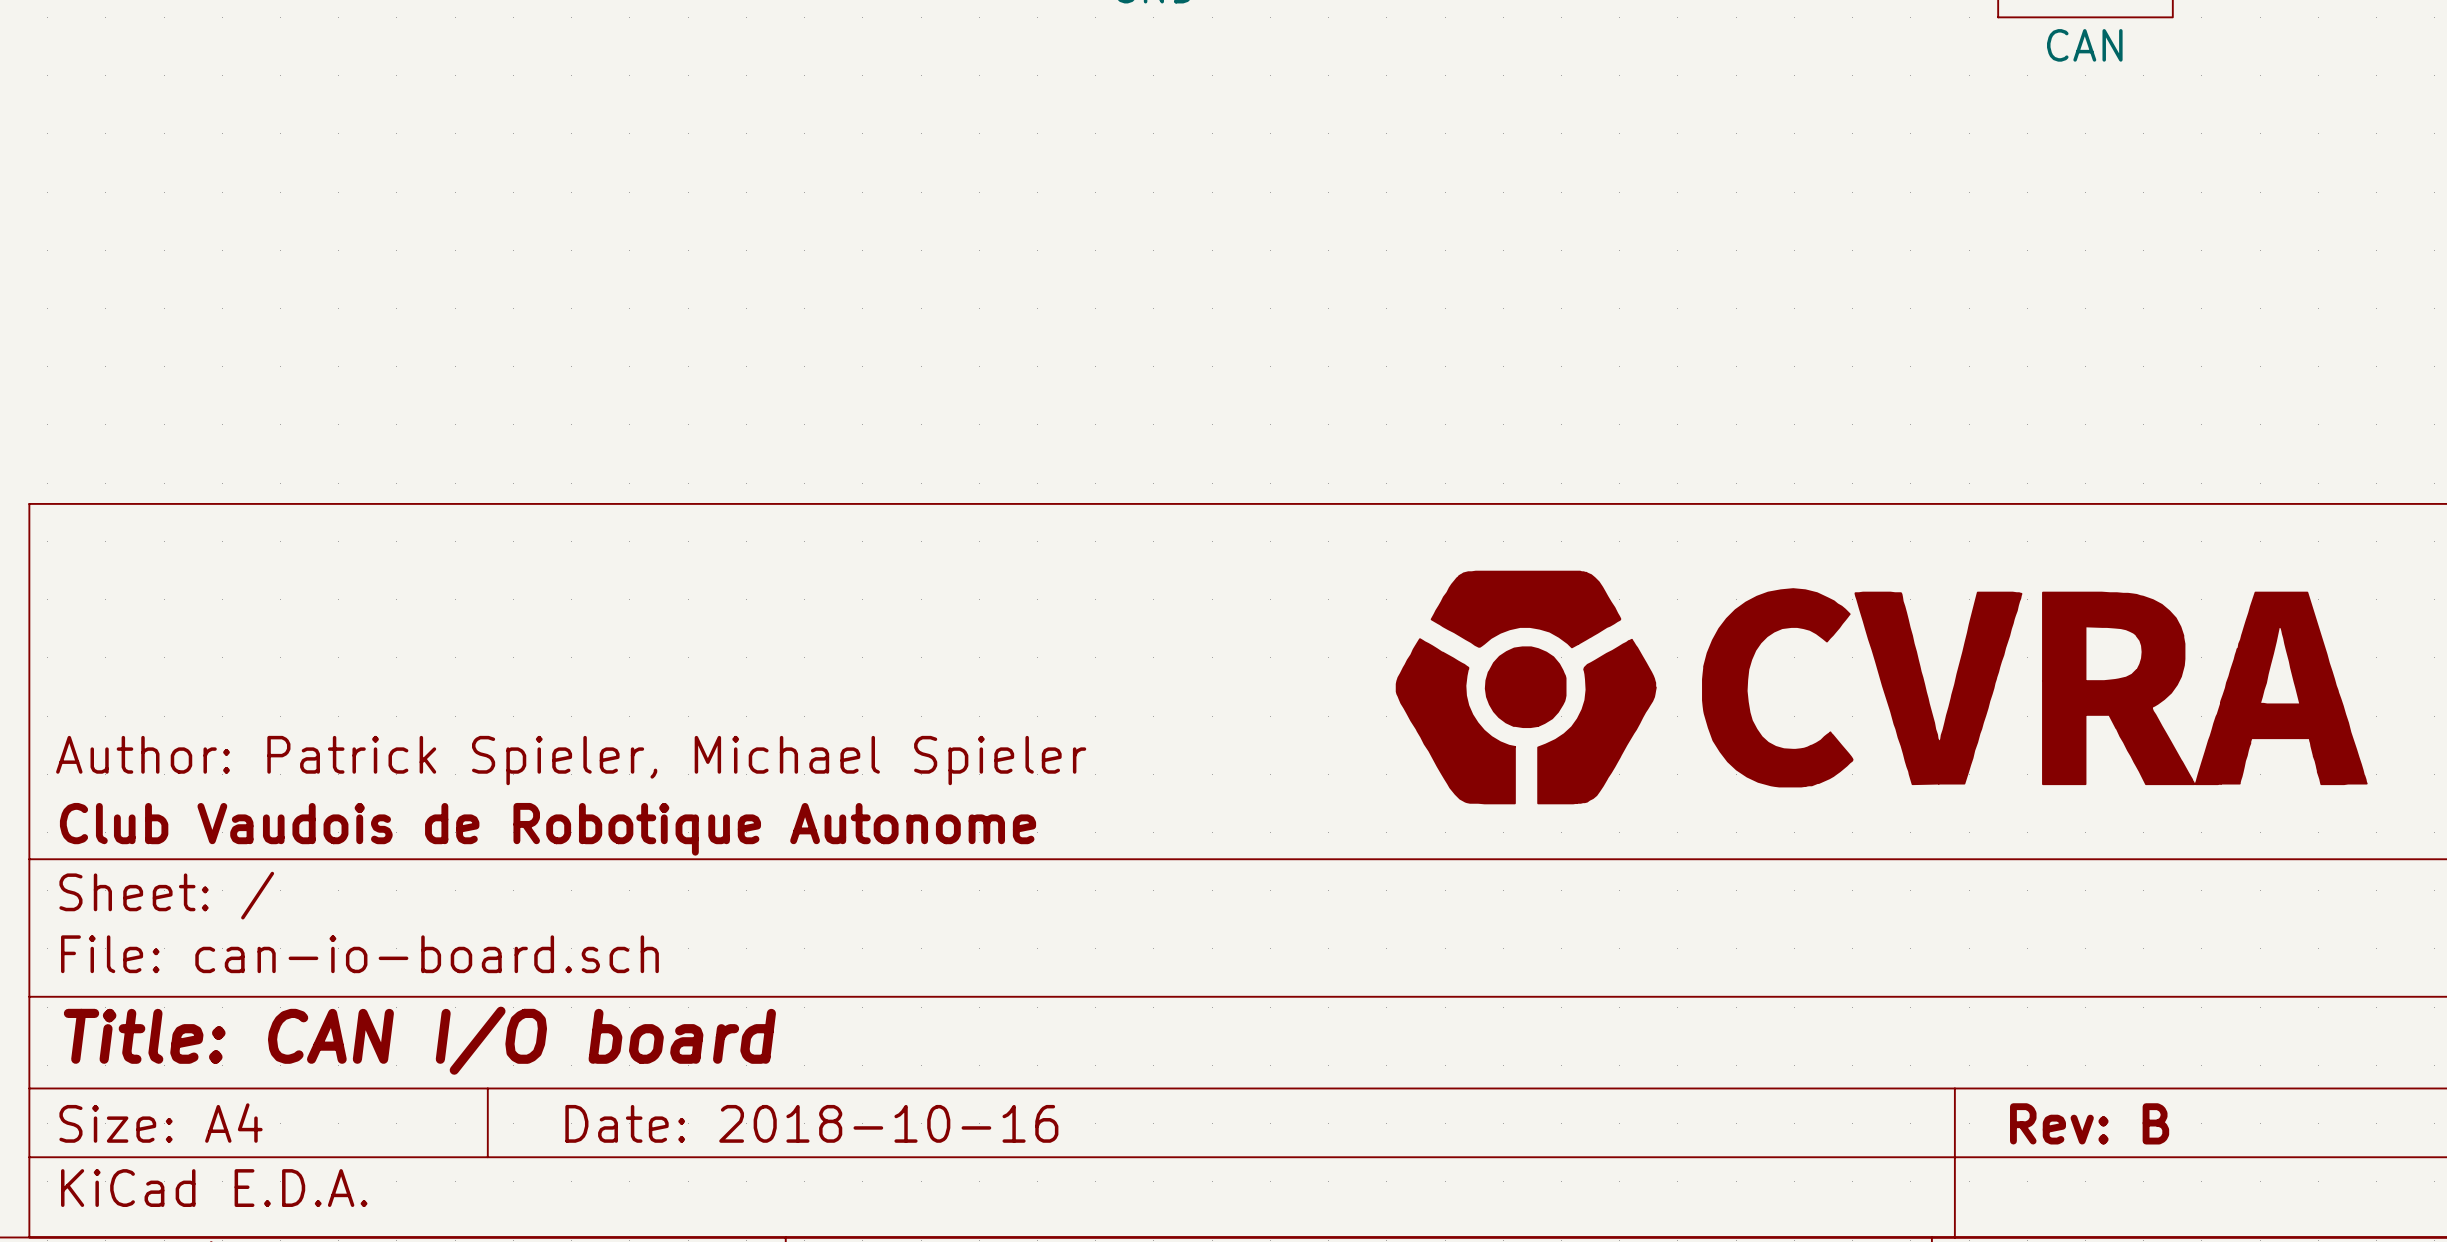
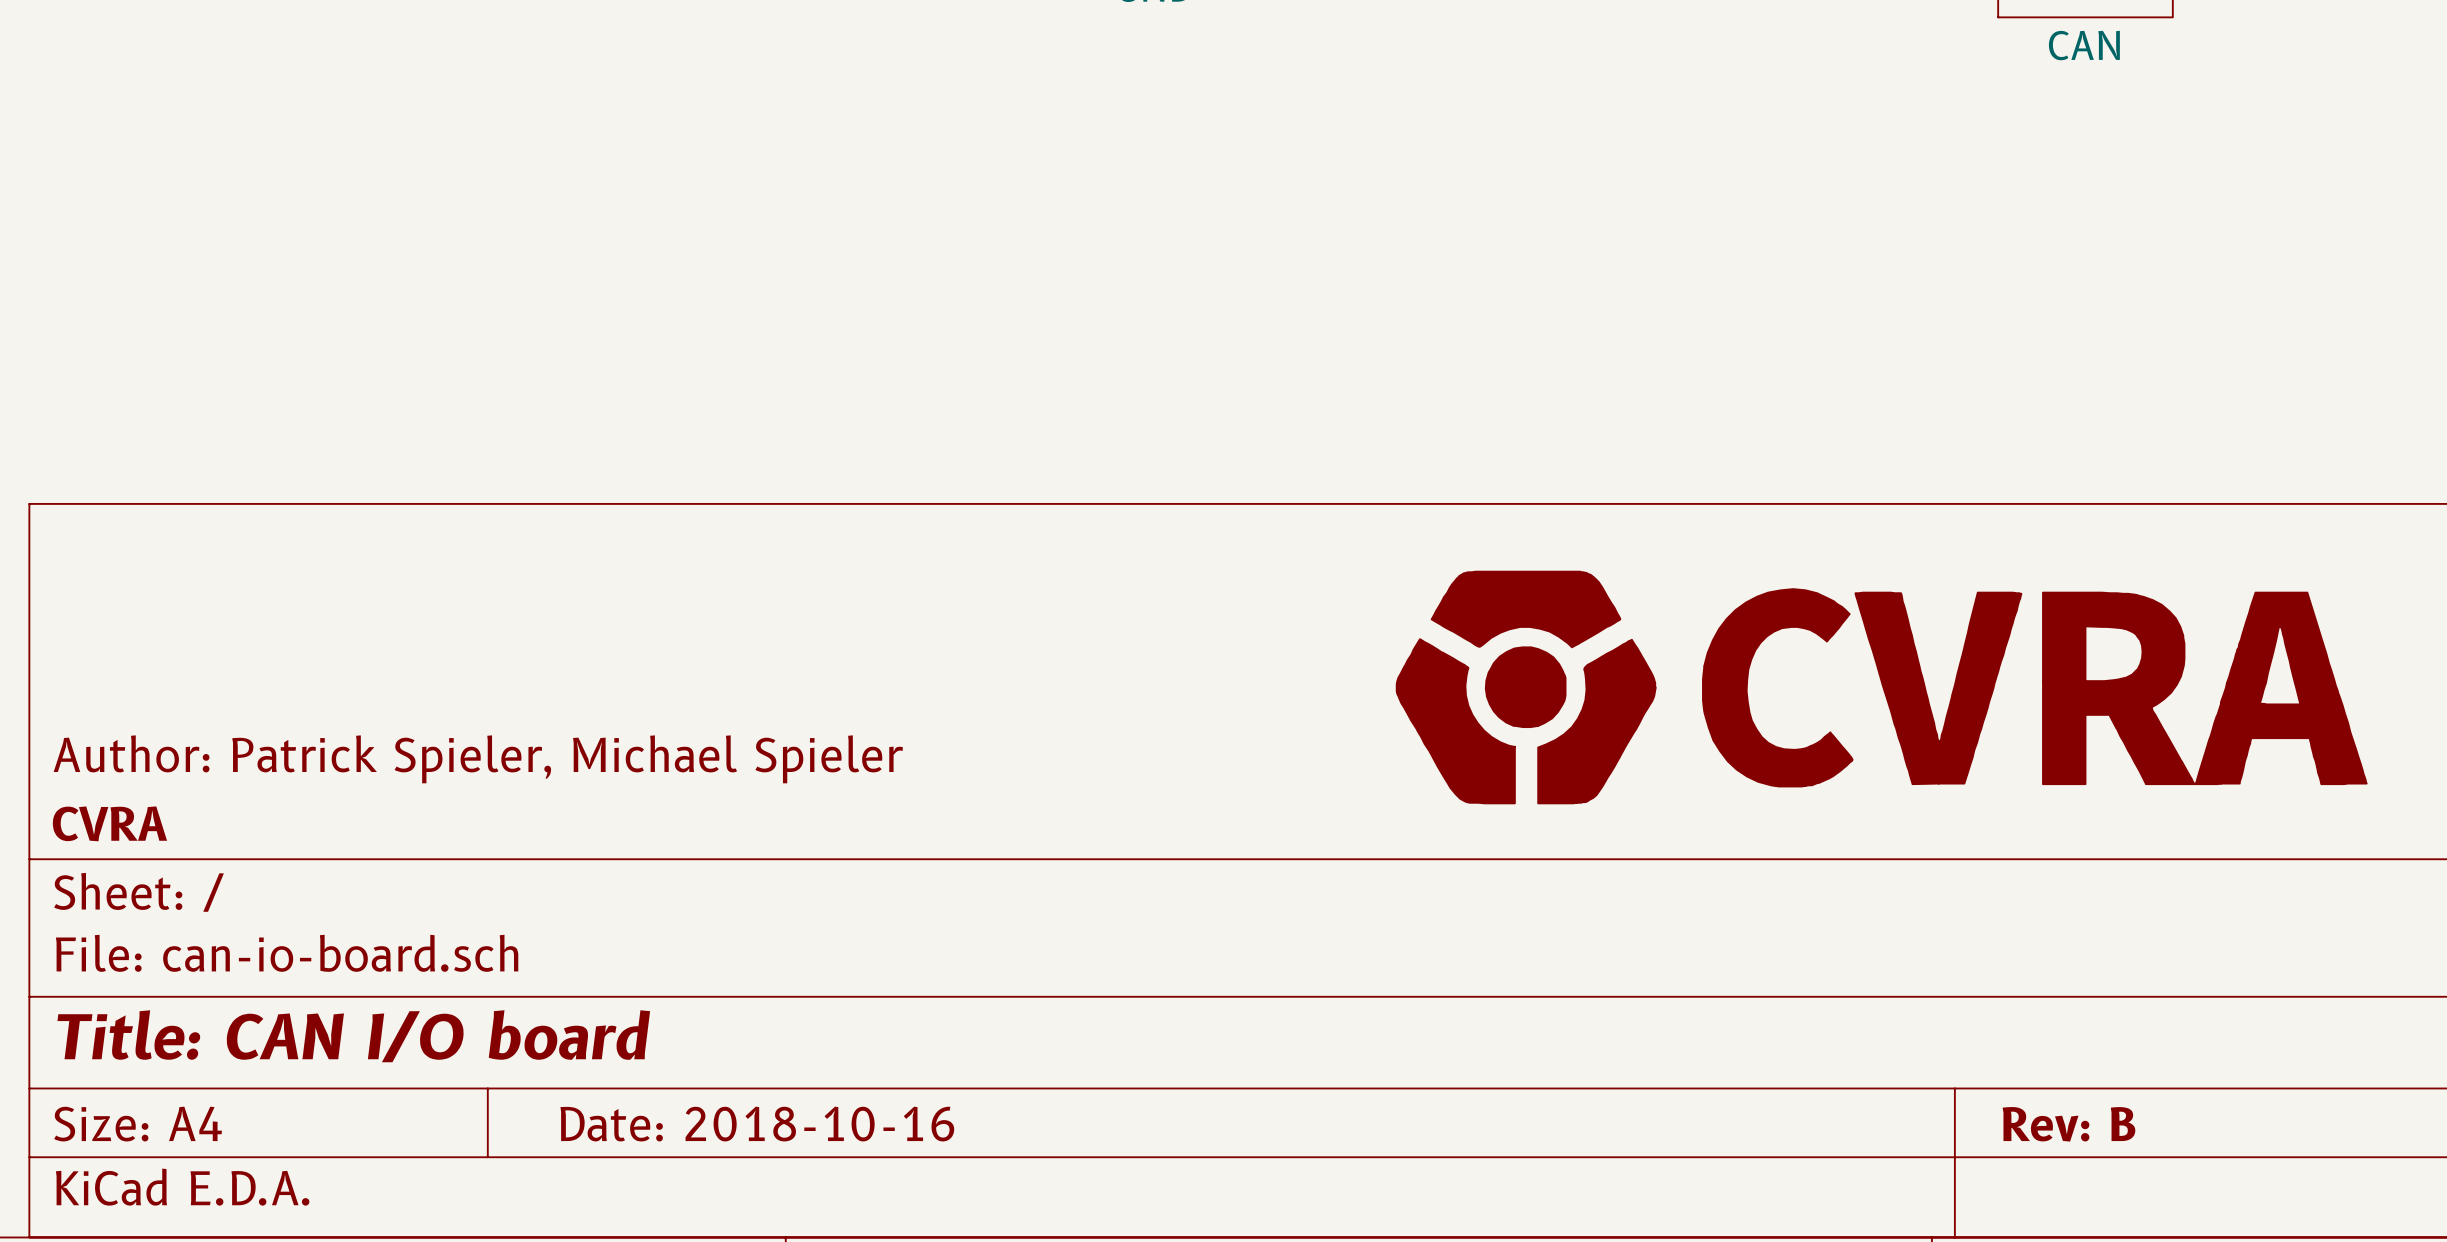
title block: Club Vaudois de Robotique Autonome (548, 829) -> CVRA (109, 823)

